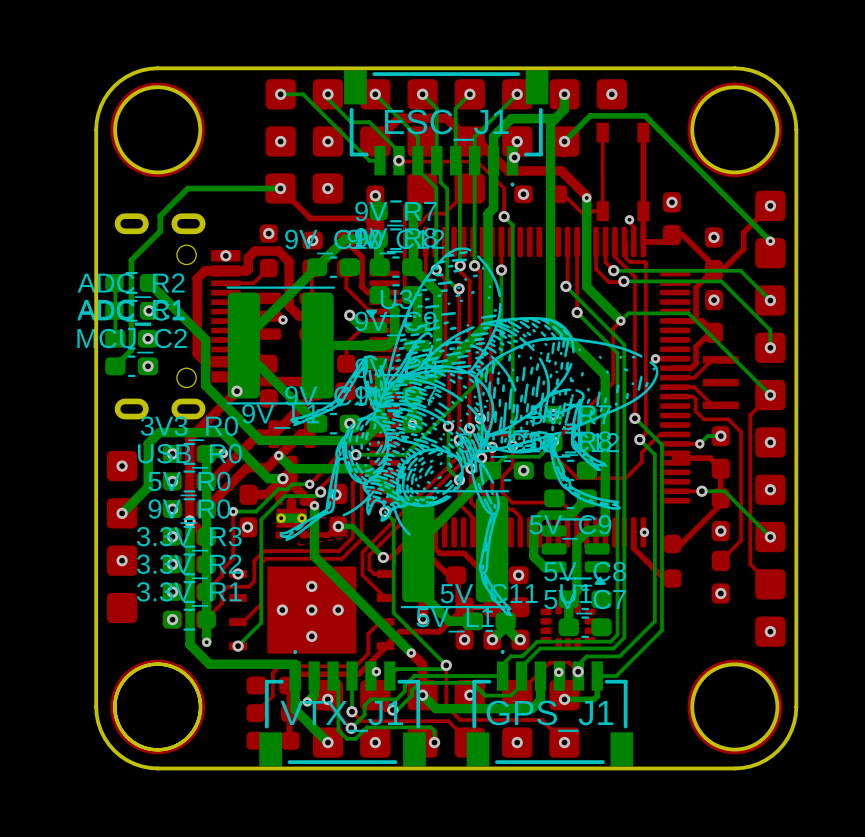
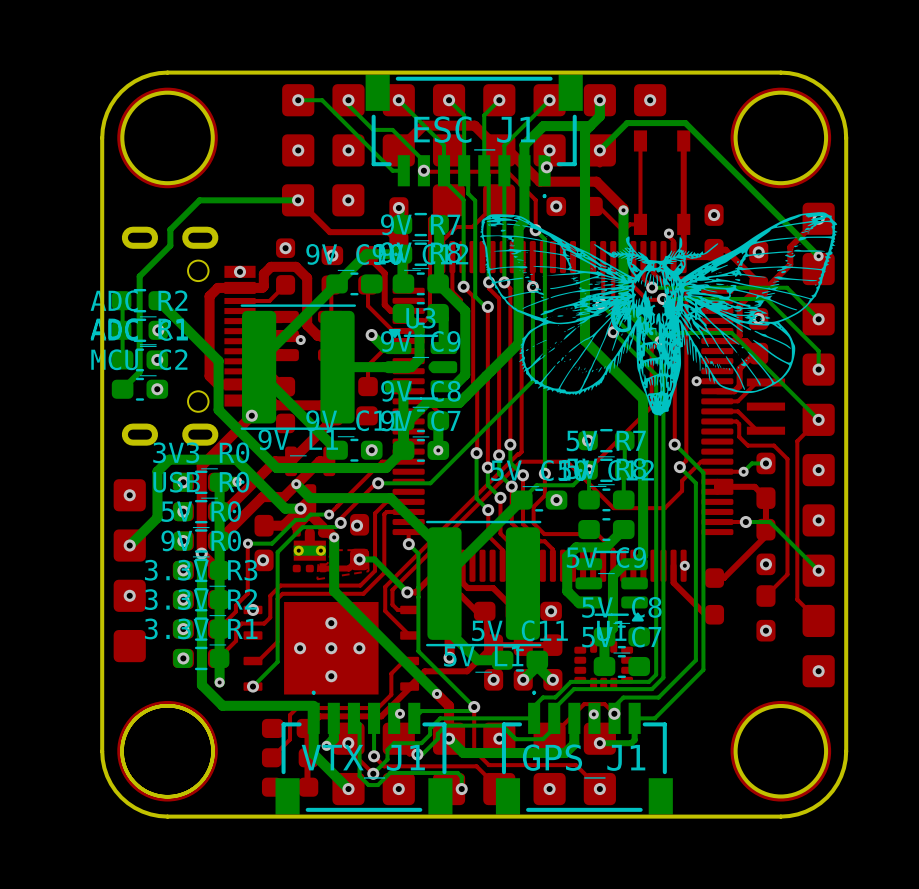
drawing: [279, 247, 659, 617] -> none
part: none -> (658, 313)

